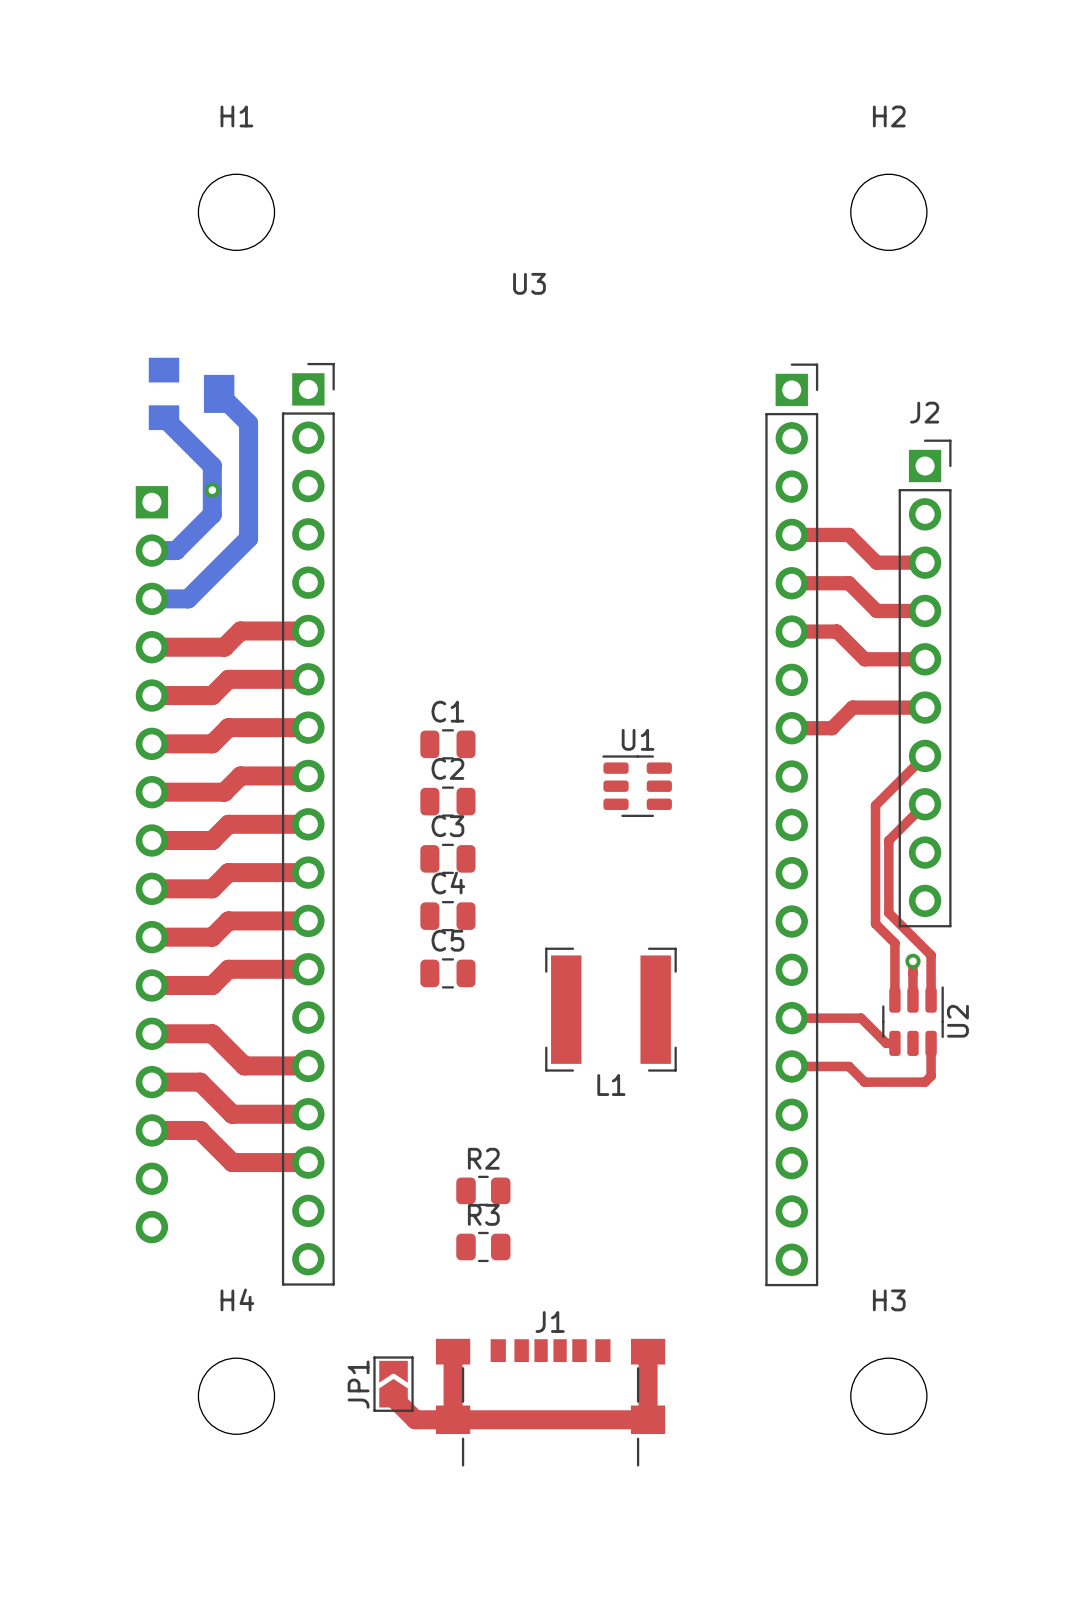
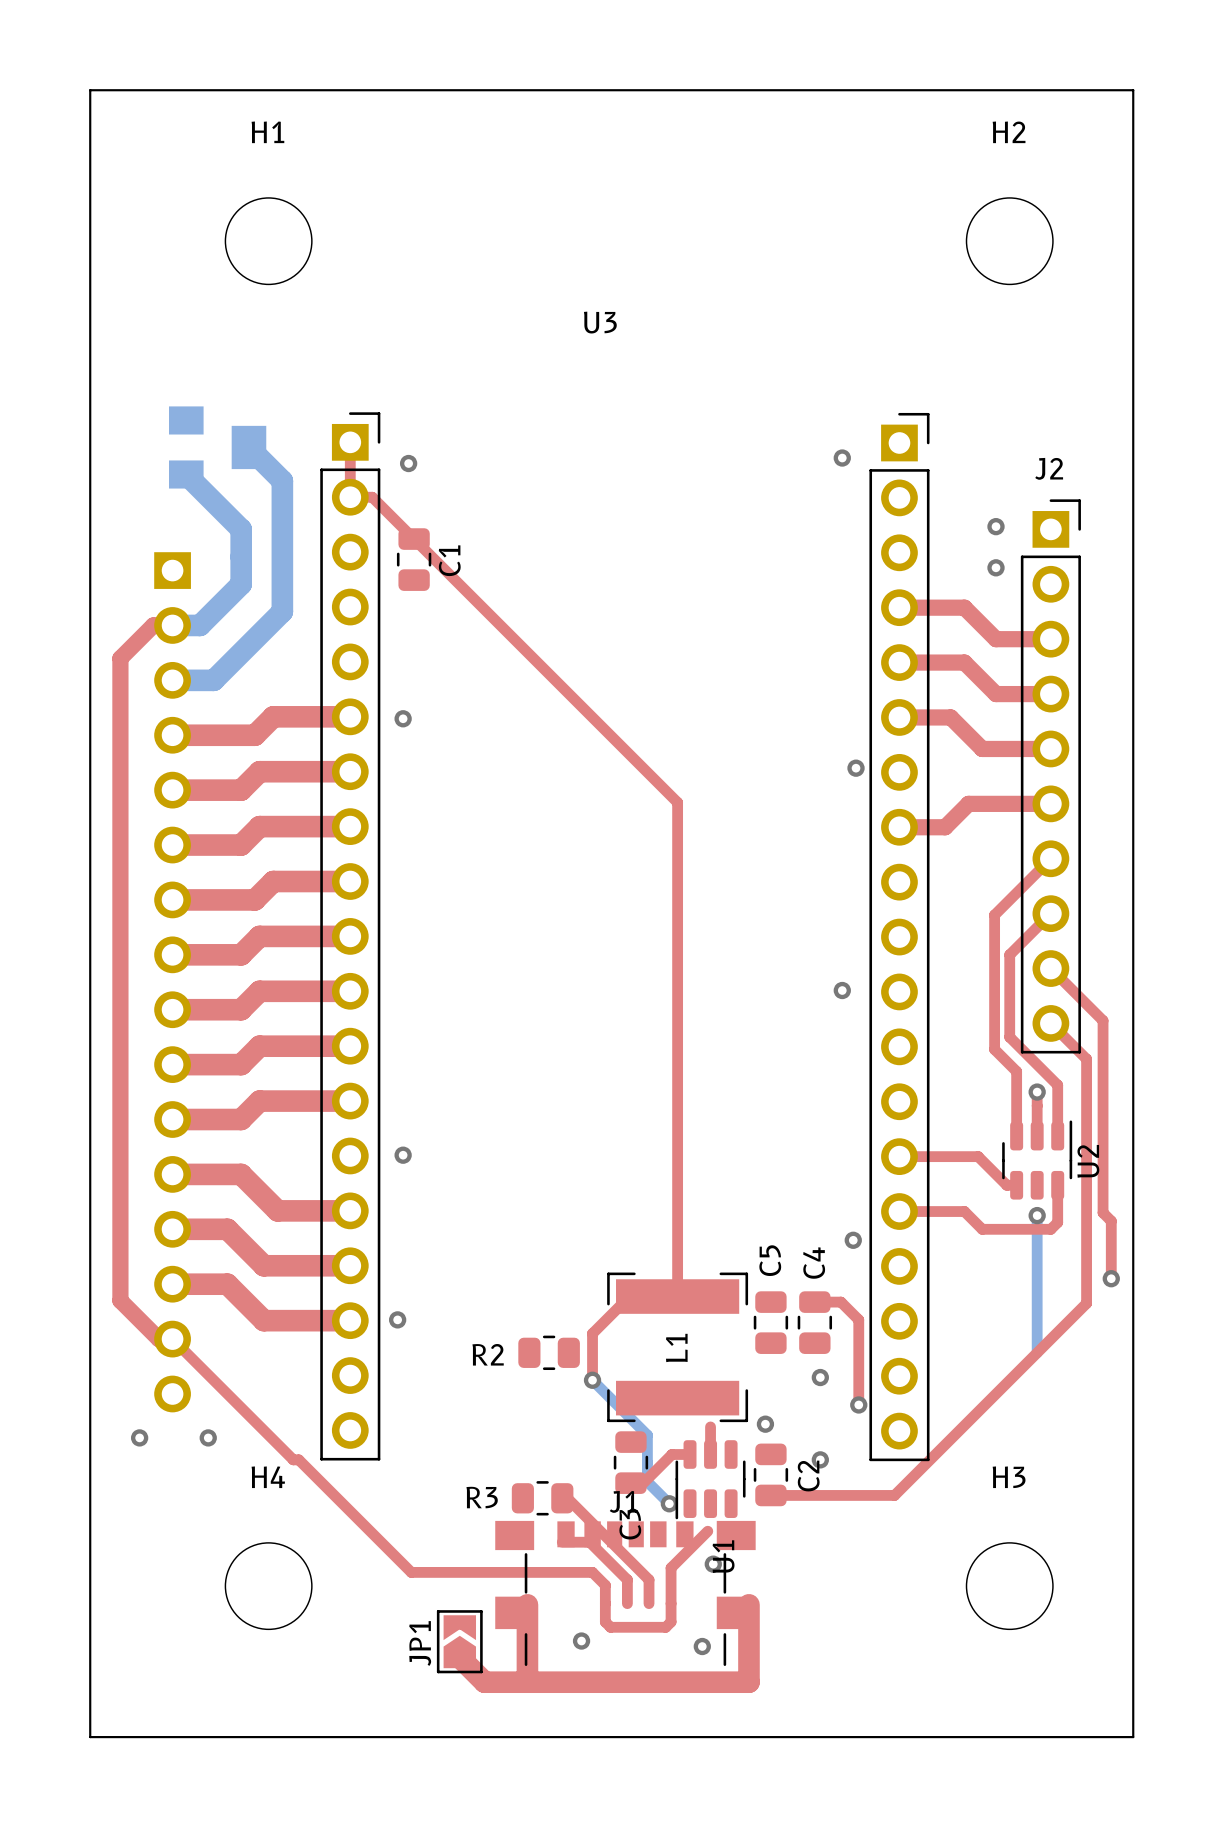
board edge: none -> (90, 90) (1133, 90) (1133, 1737) (90, 1737) (90, 90)
top track: none -> (350, 442) (350, 497) (372, 497) (677, 802) (677, 1296) (629, 1296) (592, 1333) (592, 1380)
via: none -> (842, 458)
via: none -> (408, 463)
via: none -> (996, 526)
via: (212, 490) -> none
via: none -> (996, 567)
top track: none -> (172, 625) (153, 625) (120, 658) (120, 1300) (158, 1339) (172, 1339) (293, 1459) (298, 1459) (411, 1572) (592, 1572) (605, 1585) (605, 1622) (610, 1627) (665, 1627) (671, 1622) (671, 1567) (707, 1531)
via: none -> (403, 718)
via: none -> (856, 768)
U1 name position: U1 (638, 739) -> U1 (723, 1556)
C1 rotation: 0° (447, 744) -> 90° clockwise (414, 559)
C1 position: (447, 744) -> (414, 559)
U1 rotation: 0° (637, 786) -> 90° counterclockwise (710, 1479)
U1 position: (637, 786) -> (710, 1479)
C2 rotation: 0° (447, 801) -> 90° clockwise (770, 1474)
C2 position: (447, 801) -> (770, 1474)
C3 name position: C3 (447, 826) -> C3 (630, 1524)
top track: none -> (1050, 968) (1103, 1020) (1103, 1212) (1111, 1221) (1111, 1275)
C3 rotation: 0° (447, 858) -> 90° clockwise (630, 1462)
C3 position: (447, 858) -> (630, 1462)
via: none -> (842, 990)
top track: none -> (1050, 1023) (1086, 1059) (1086, 1303) (894, 1495) (770, 1495)
C4 rotation: 0° (447, 916) -> 90° clockwise (814, 1322)
C4 position: (447, 916) -> (814, 1322)
C5 rotation: 0° (447, 973) -> 90° clockwise (770, 1322)
C5 position: (447, 973) -> (770, 1322)
L1 rotation: 0° (610, 1009) -> 90° clockwise (677, 1347)
L1 position: (610, 1009) -> (677, 1347)
via: none -> (403, 1155)
bottom track: none -> (1037, 1215) (1037, 1352)
via: none -> (1037, 1215)
L1 name position: L1 (611, 1085) -> L1 (676, 1347)
via: none -> (853, 1240)
via: none -> (1111, 1278)
top track: none -> (814, 1302) (840, 1302) (858, 1319) (858, 1404)
R2 name position: R2 (483, 1158) -> R2 (488, 1354)
via: none -> (397, 1319)
via: none -> (820, 1377)
R3 name position: R3 (483, 1214) -> R3 (482, 1497)
bottom track: none -> (592, 1380) (647, 1435) (647, 1481) (669, 1503)
via: none -> (592, 1380)
via: none -> (858, 1404)
R3 position: (483, 1246) -> (542, 1498)
via: none -> (765, 1424)
top track: none -> (710, 1426) (710, 1454)
via: none -> (139, 1437)
via: none -> (208, 1437)
top track: none -> (690, 1454) (672, 1454) (643, 1483) (630, 1483)
via: none -> (820, 1459)
top track: none -> (562, 1498) (567, 1498) (649, 1579) (649, 1603)
via: none -> (669, 1503)
top track: (453, 1351) (453, 1419) -> (527, 1604) (527, 1682)
top track: (648, 1351) (648, 1419) (415, 1419) (393, 1397) -> (748, 1604) (748, 1682) (484, 1682) (459, 1657)
top track: none -> (562, 1542) (589, 1542) (627, 1579) (627, 1603)
via: none -> (713, 1564)
JP1 position: (393, 1384) -> (459, 1641)
via: none -> (581, 1641)
via: none -> (702, 1646)

